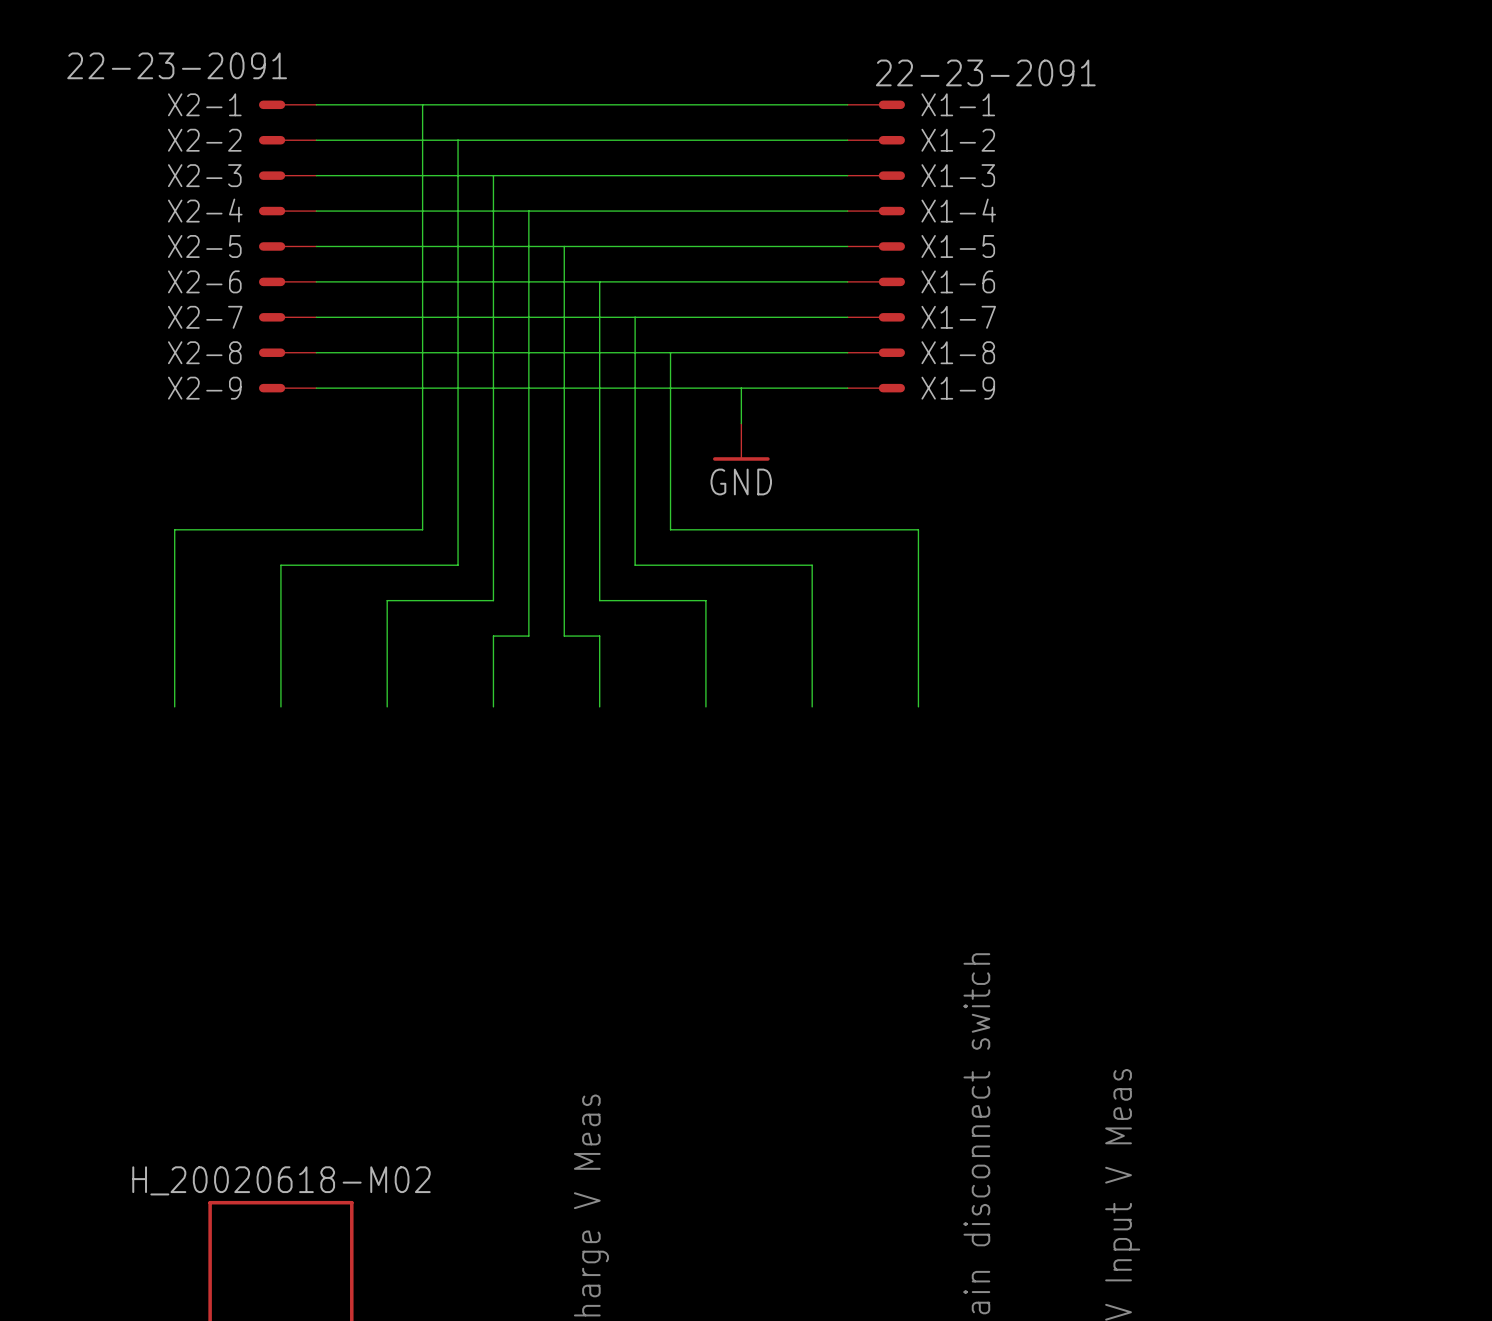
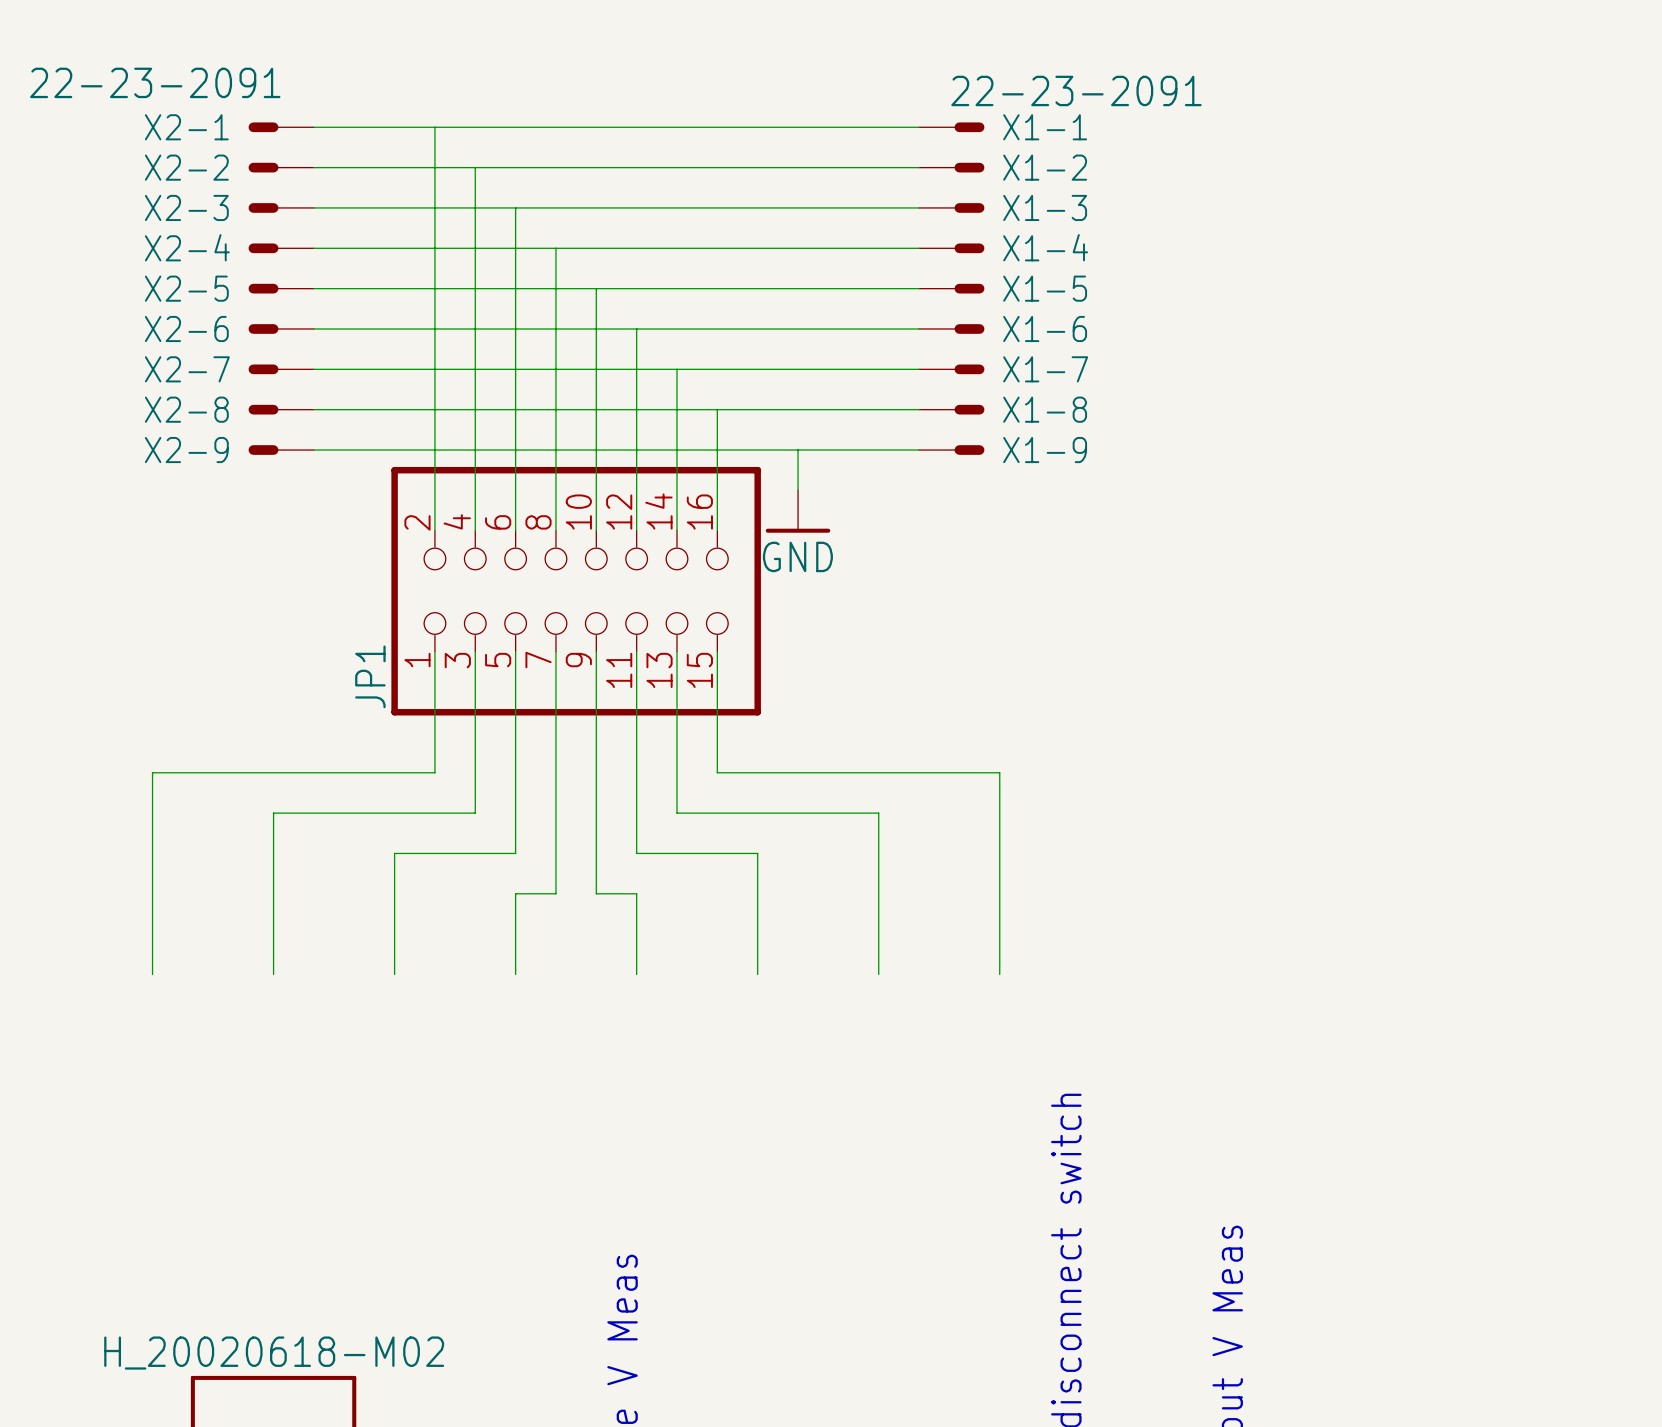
wire: (422, 458) (422, 529) (174, 529) (174, 671) -> (434, 651) (434, 772) (152, 772)
wire: (458, 458) (458, 565) (280, 565) (280, 706) -> none
wire: (493, 458) (493, 565) -> none
wire: (528, 458) (528, 565) -> none
wire: (564, 458) (564, 565) -> none
wire: (599, 458) (599, 565) -> none
wire: (635, 458) (635, 565) (812, 565) (812, 706) -> none
wire: (670, 458) (670, 529) (918, 529) (918, 671) -> (717, 651) (717, 772) (999, 772)
JP1: none -> (576, 591)
wire: none -> (475, 651) (475, 813) (273, 813) (273, 974)
wire: none -> (677, 651) (677, 813) (878, 813) (878, 974)
wire: (493, 600) (387, 600) (387, 706) -> none
wire: (599, 600) (705, 600) (705, 706) -> none
wire: (493, 636) (528, 636) -> (515, 732) (515, 692)
wire: none -> (555, 732) (555, 893) (515, 893) (515, 974)
wire: (564, 636) (599, 636) -> (636, 692) (636, 732)
wire: none -> (596, 732) (596, 893) (636, 893) (636, 974)
wire: none -> (152, 813) (152, 974)
wire: none -> (515, 813) (515, 853) (394, 853) (394, 974)
wire: none -> (636, 813) (636, 853) (757, 853) (757, 974)
wire: none -> (999, 813) (999, 974)

